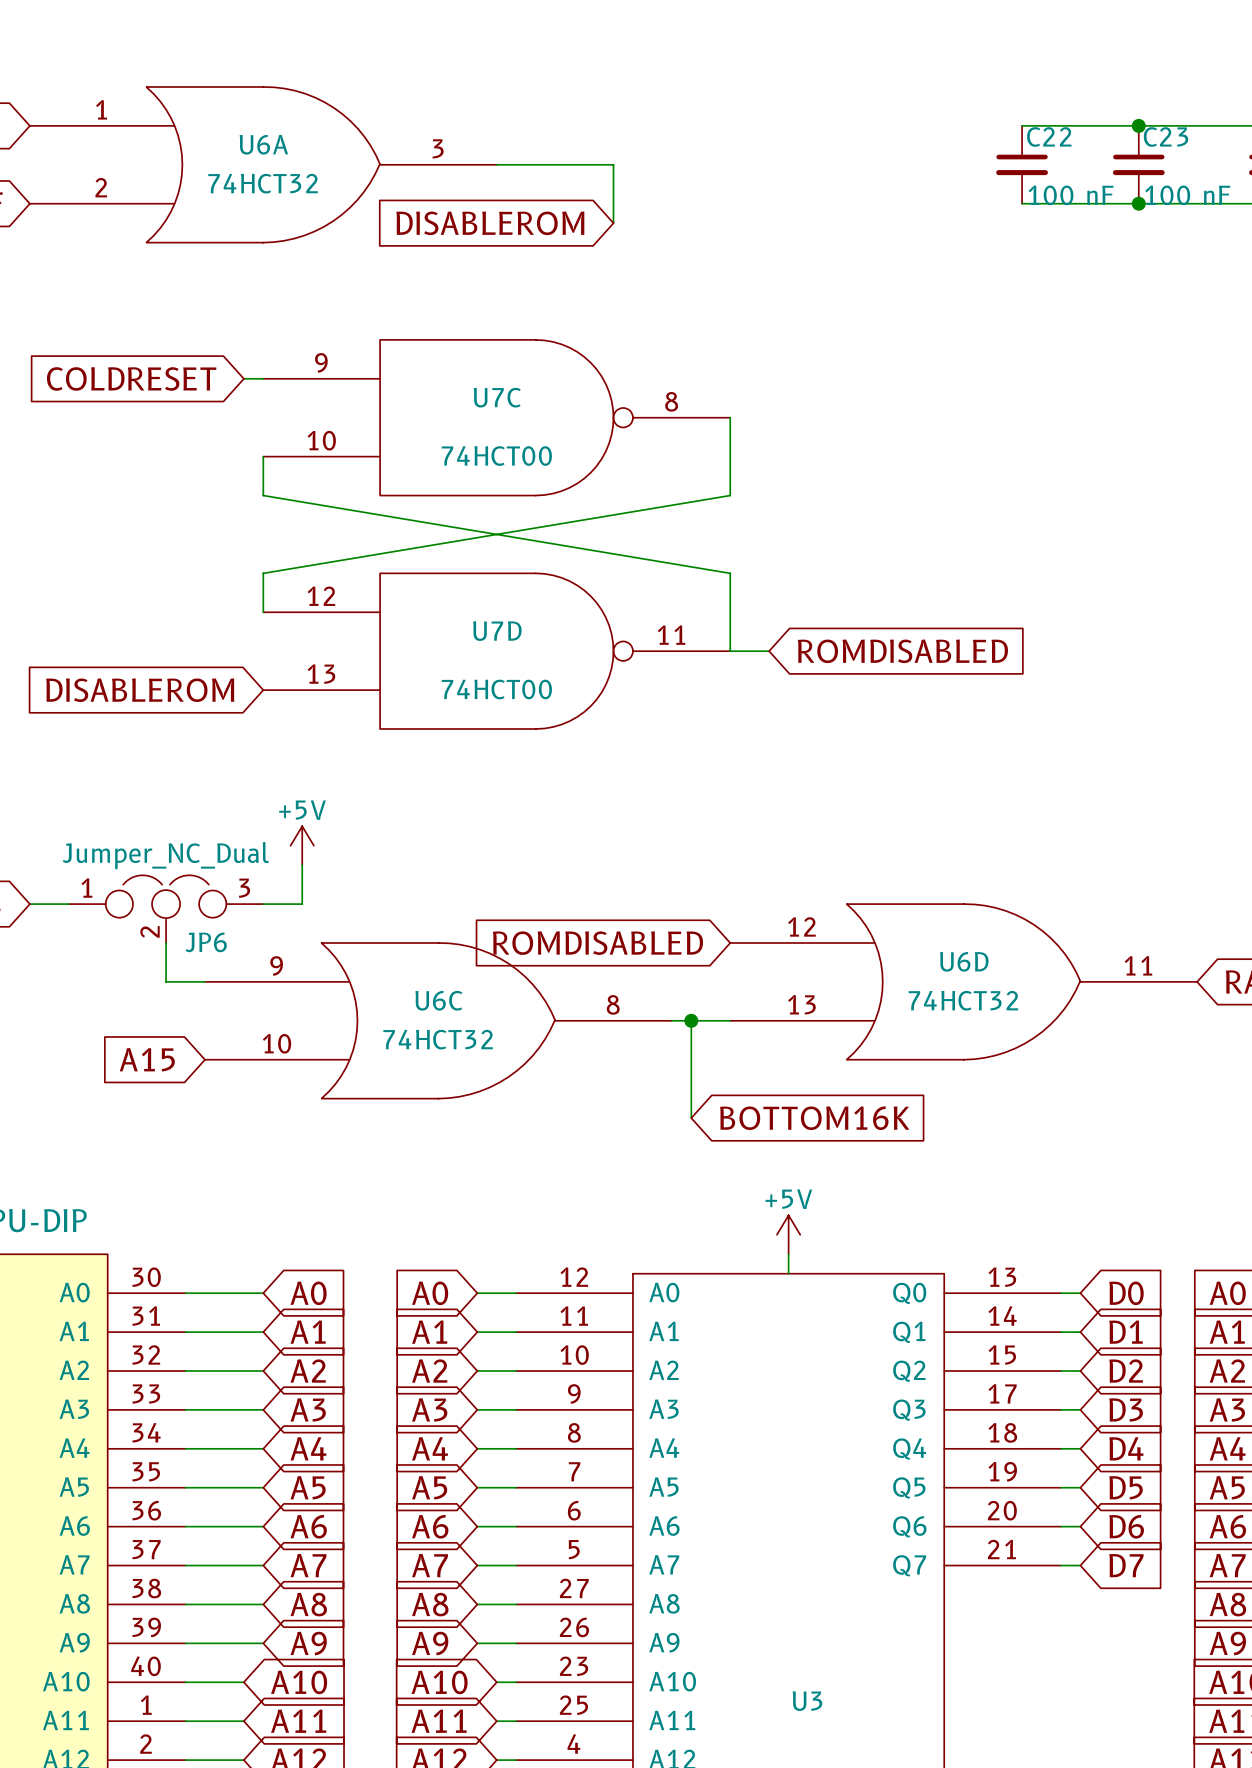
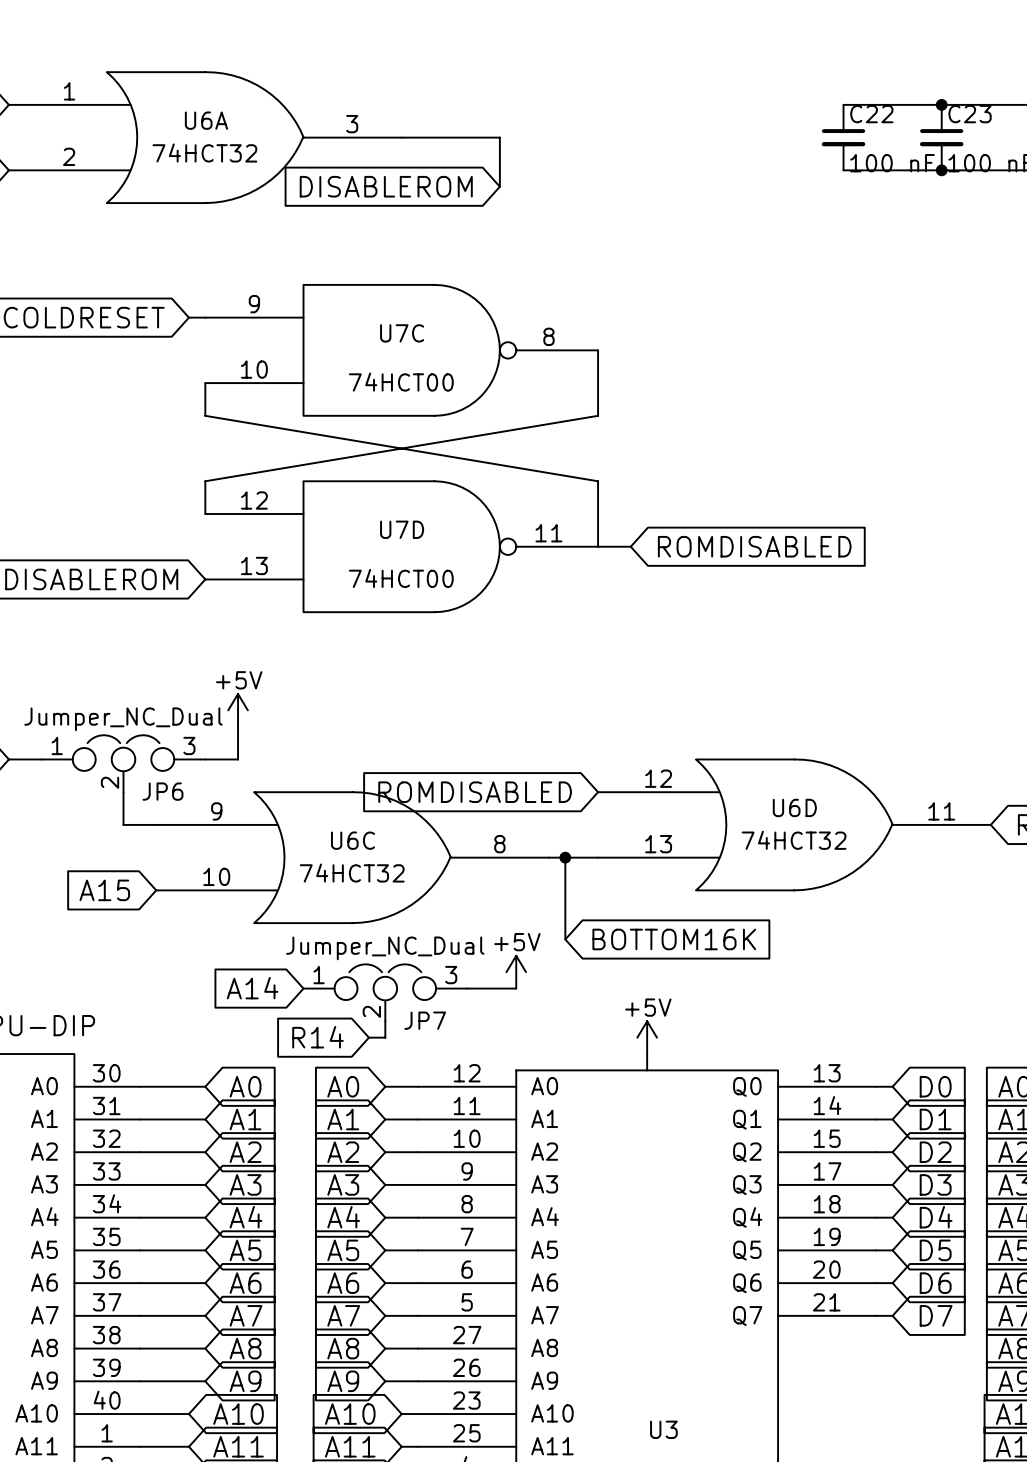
power symbol: none -> +5V (516, 972)
global label: none -> A14 (252, 988)
wire: none -> (467, 988) (516, 988)
JP7: none -> Jumper_NC_Dual (385, 992)
wire: none -> (385, 1021) (385, 1037) (368, 1037)
global label: none -> R14 (317, 1037)

